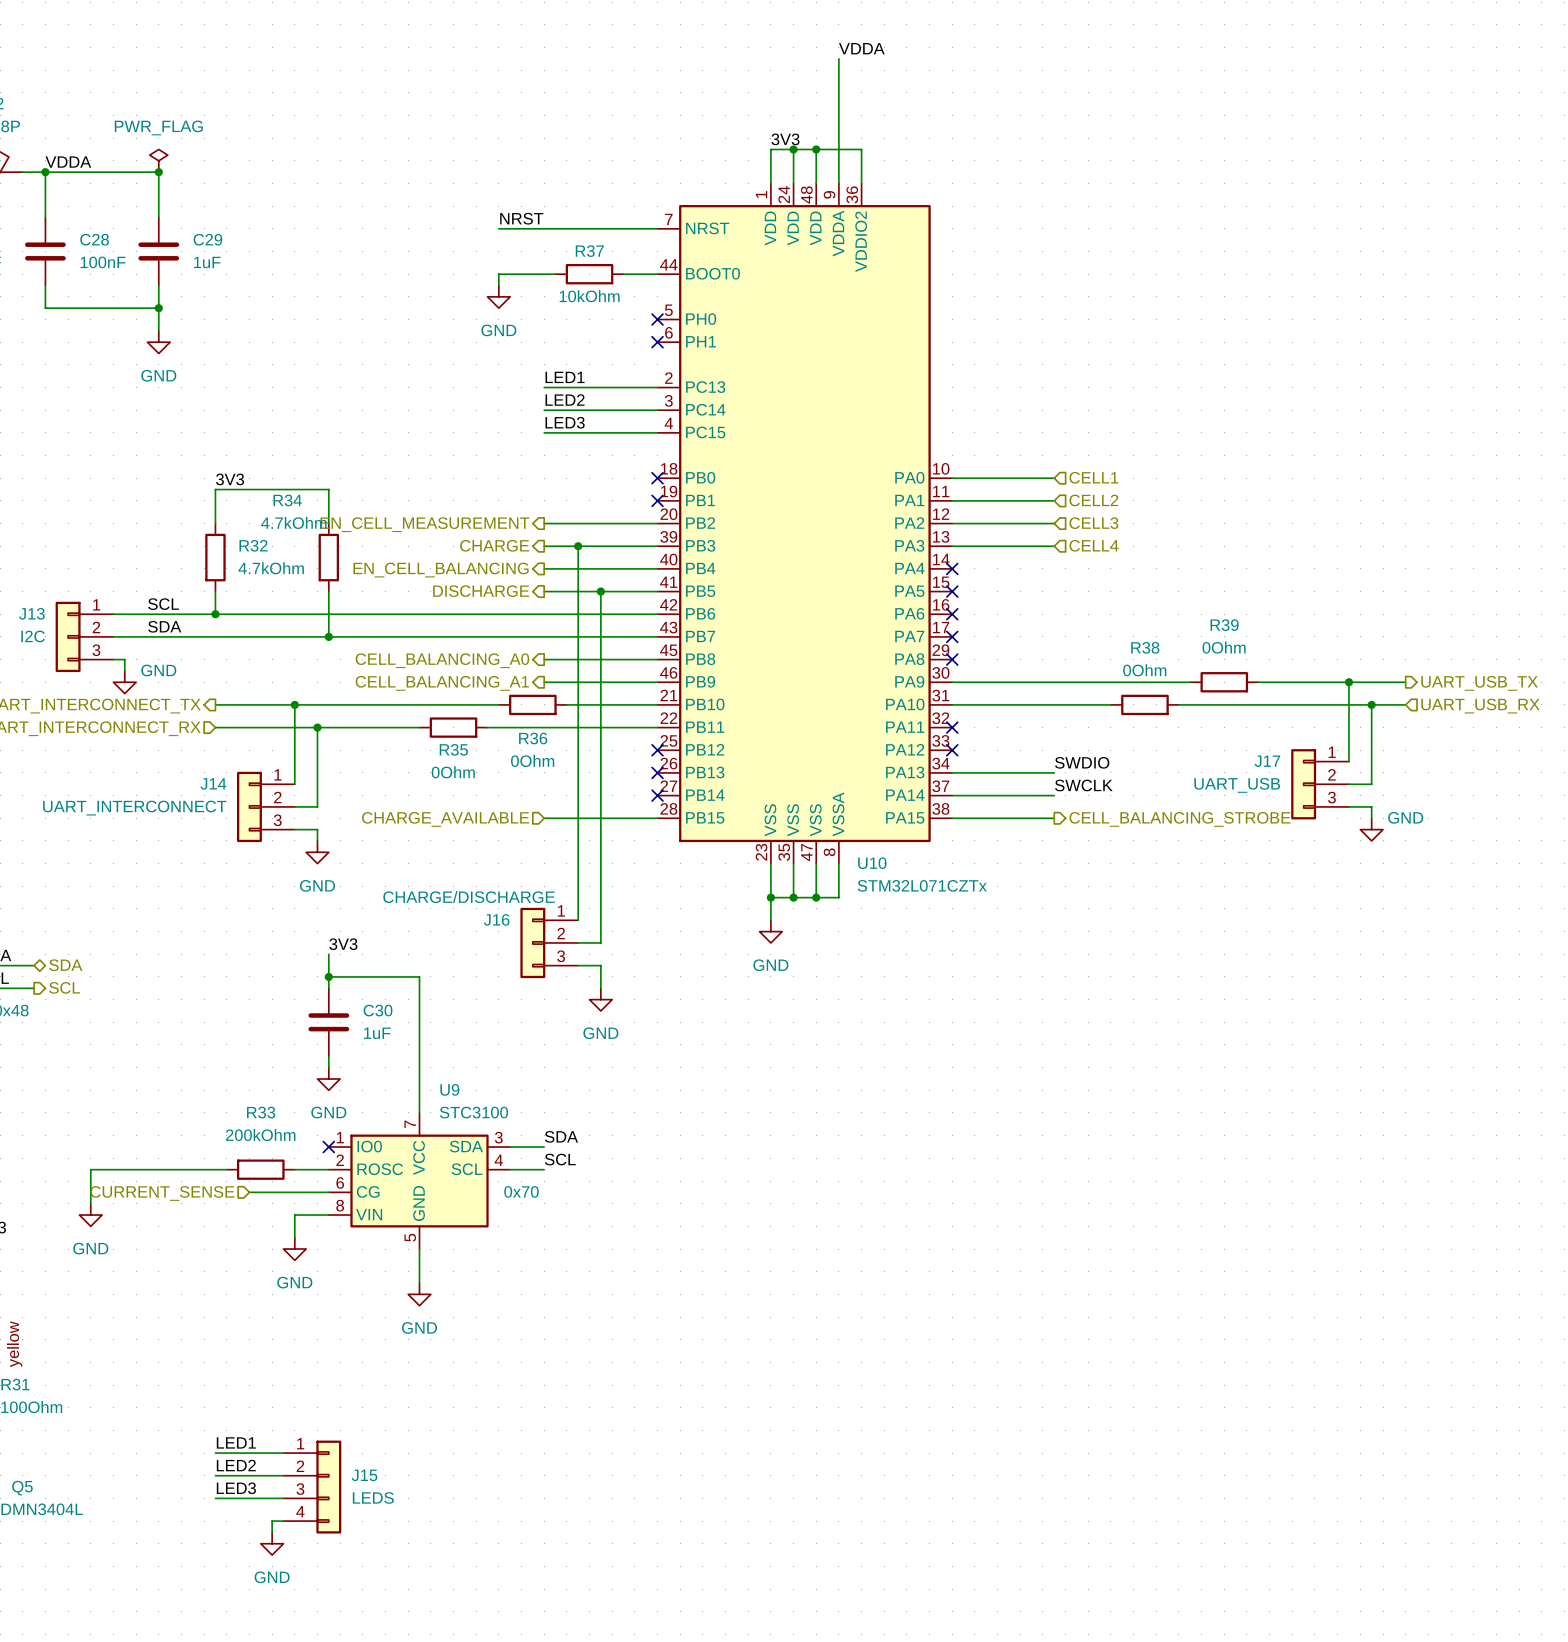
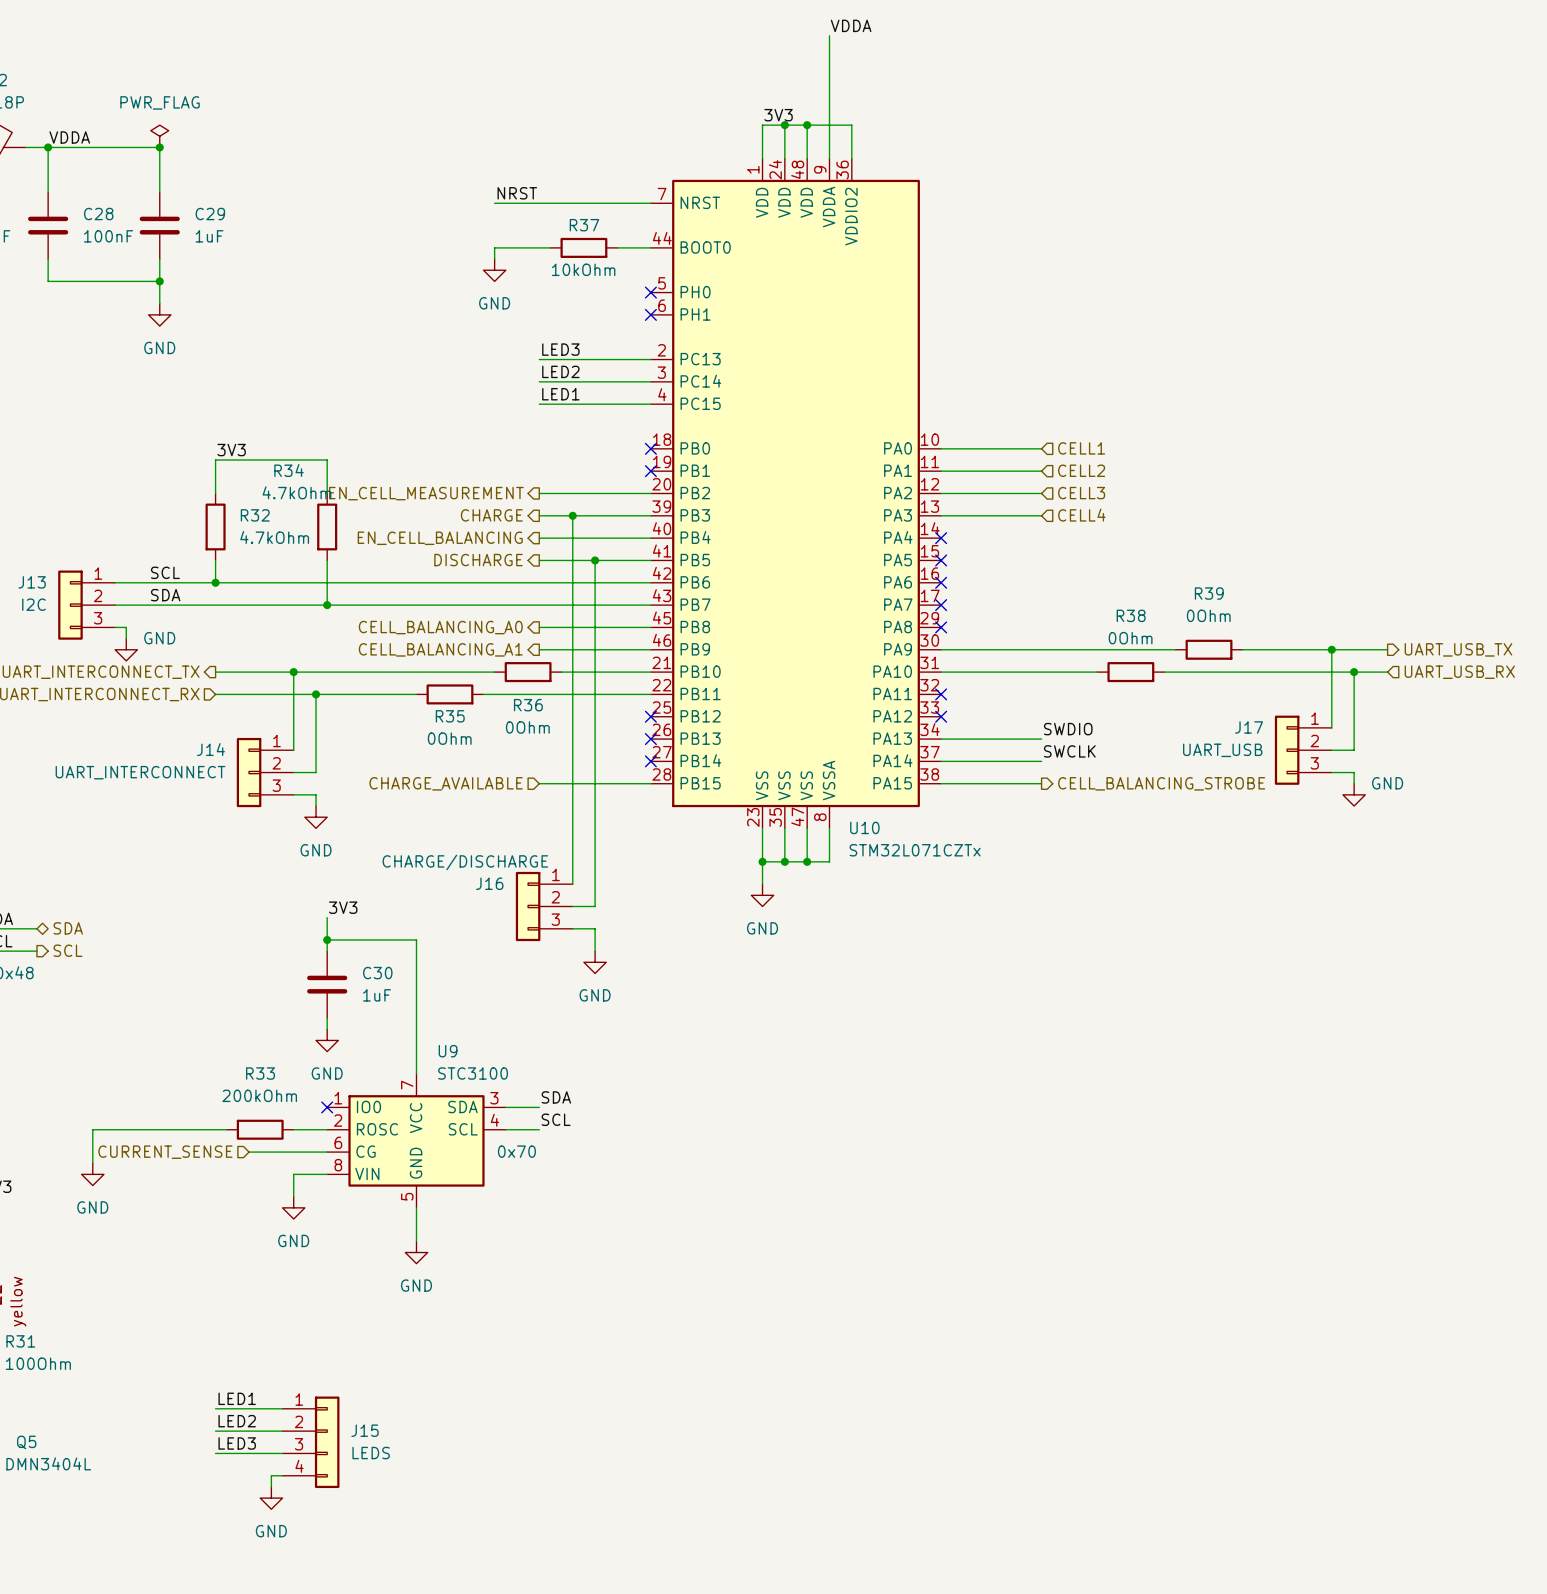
label: LED1 (565, 377) -> LED3 (560, 349)
label: LED3 (565, 422) -> LED1 (560, 394)

